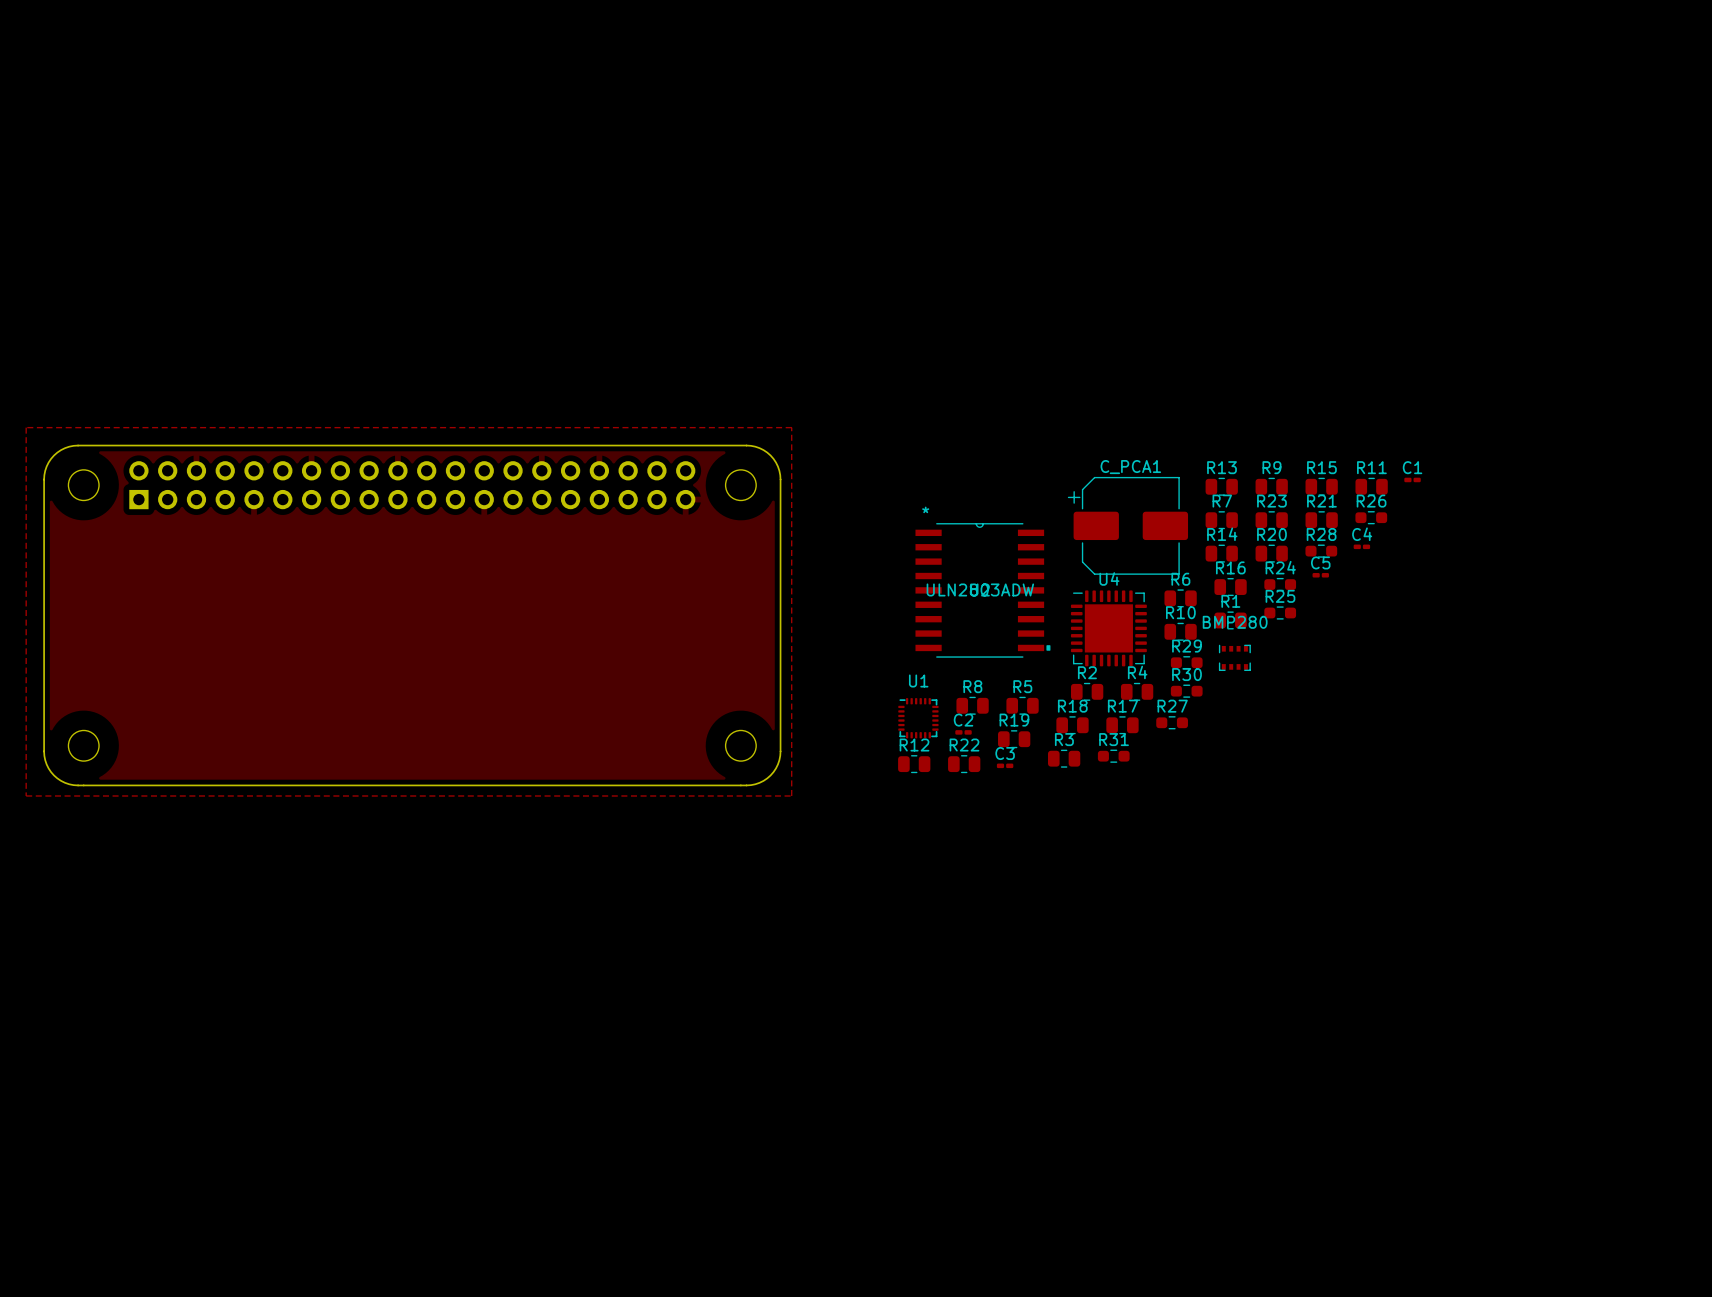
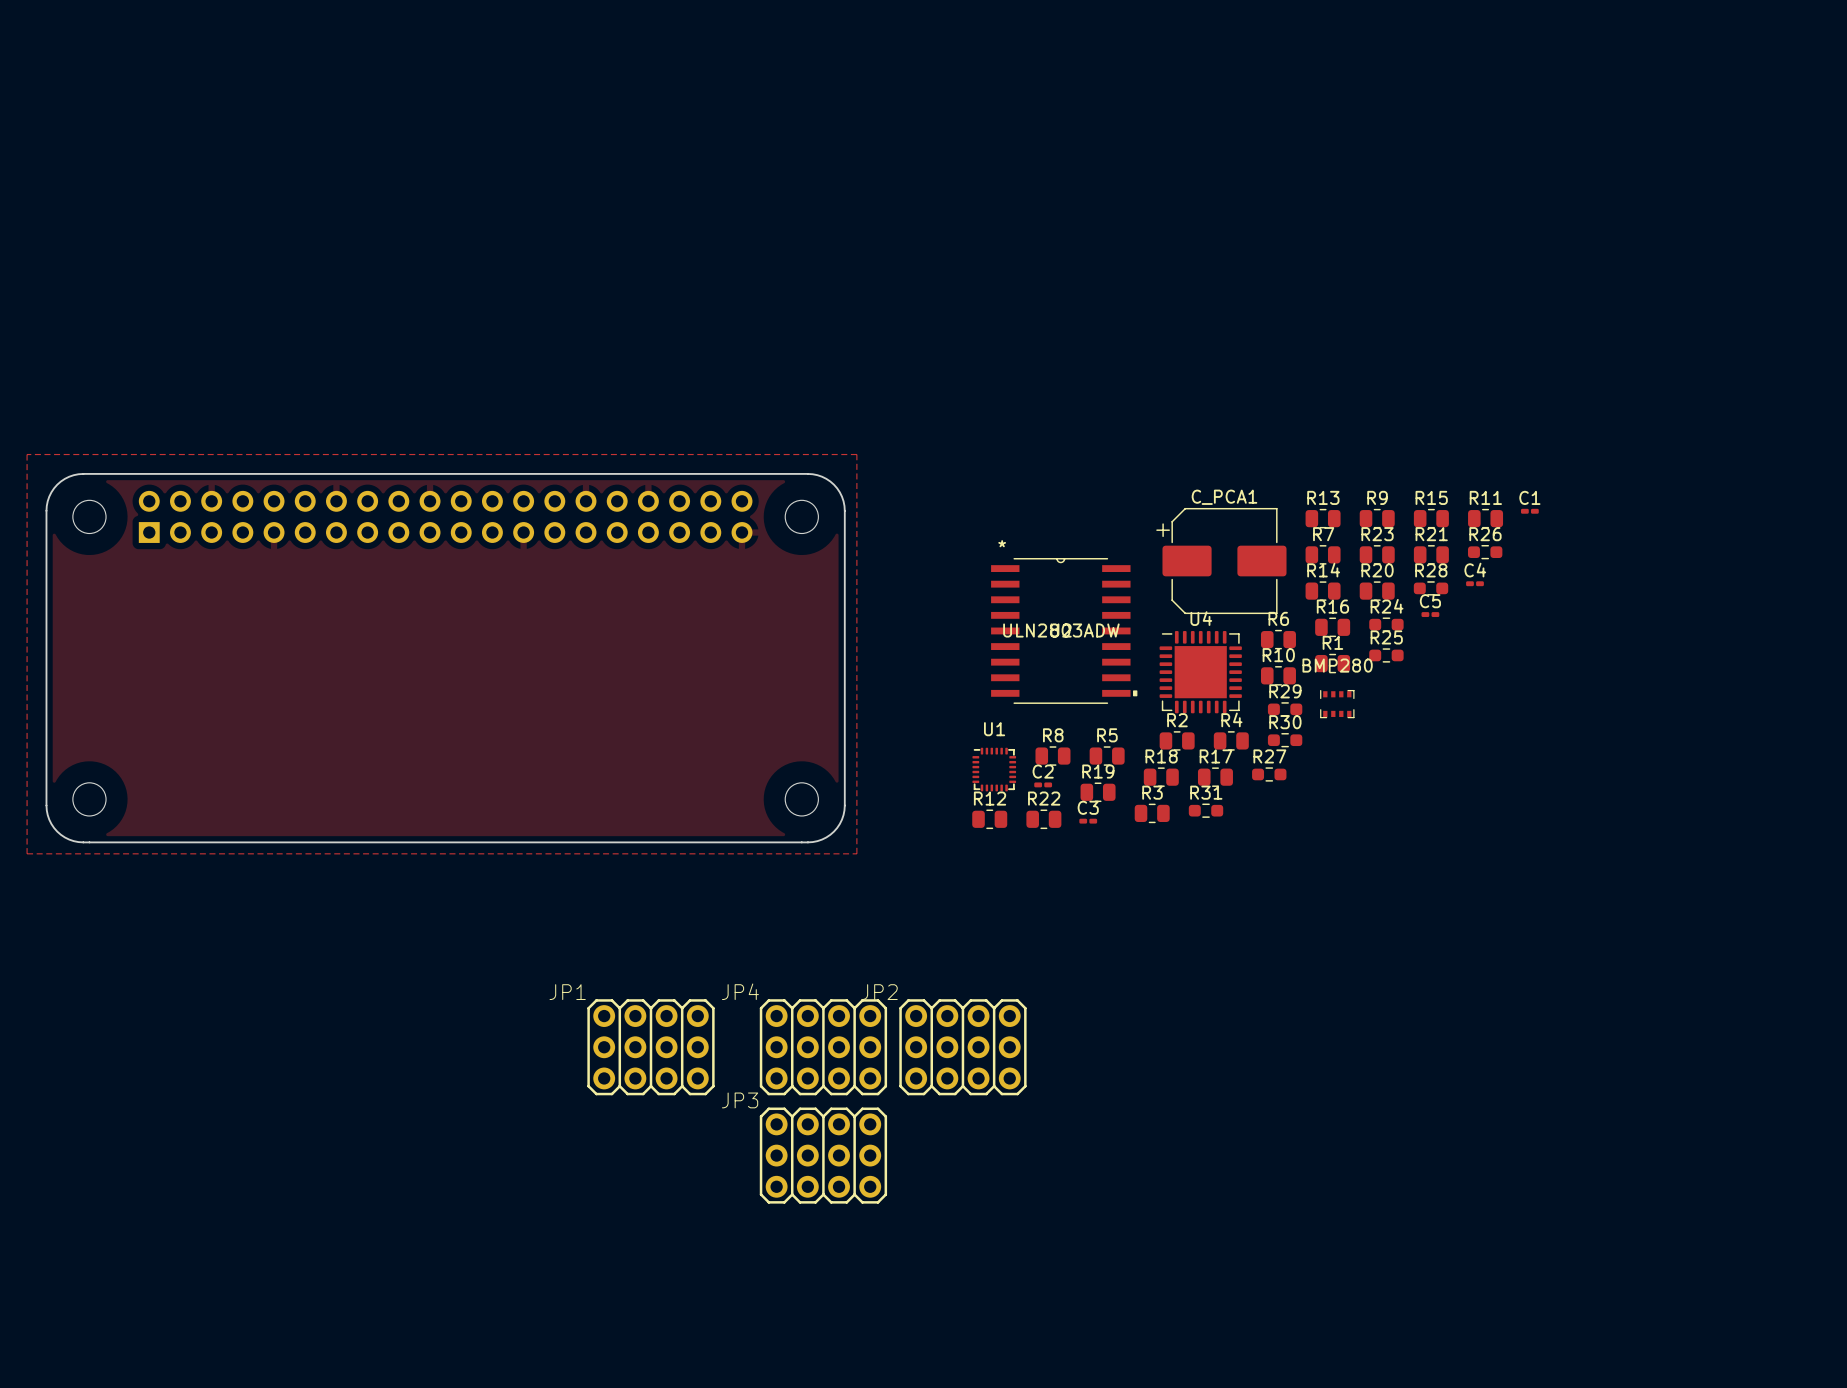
JP1: none -> (650, 1047)
JP4: none -> (823, 1047)
JP2: none -> (962, 1047)
JP3: none -> (823, 1155)

